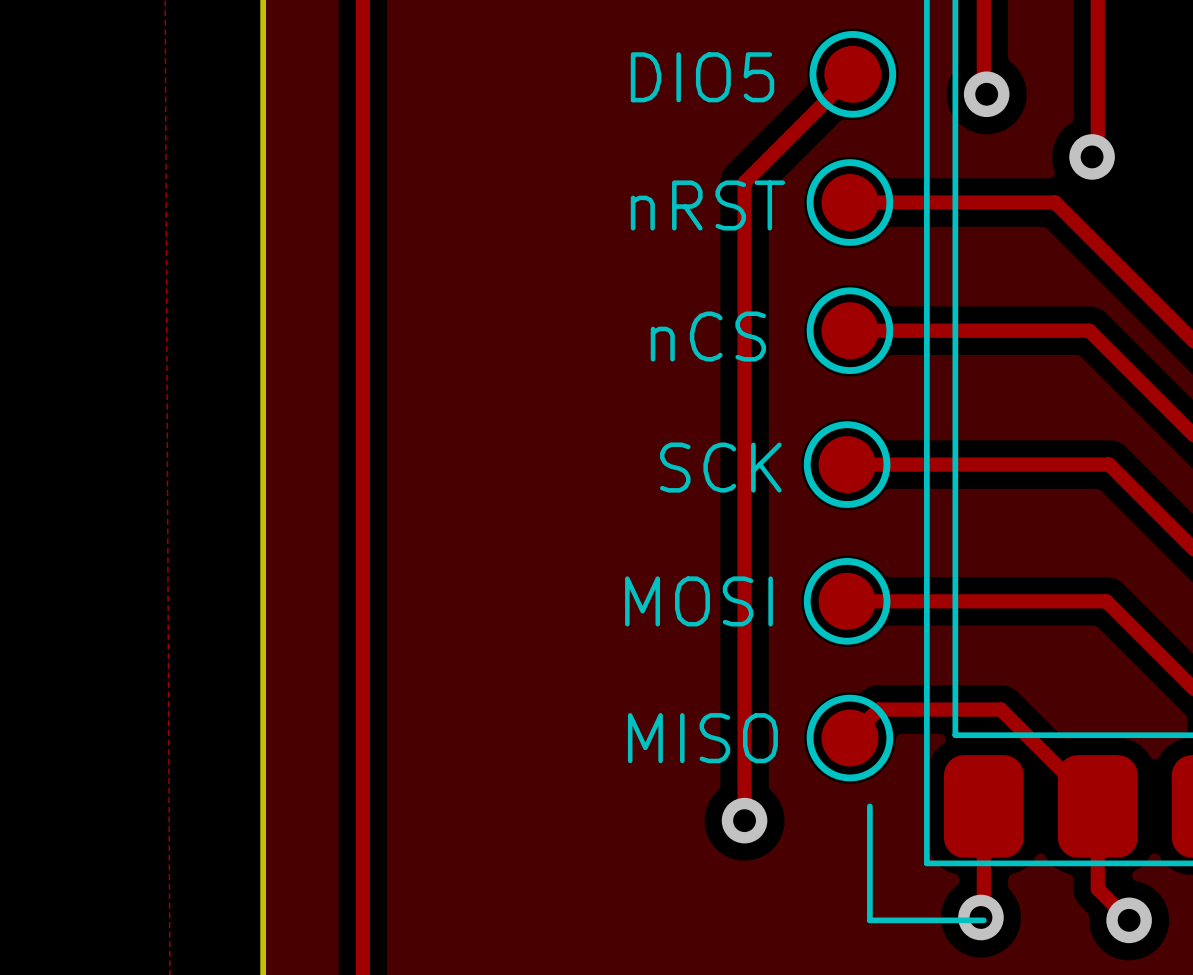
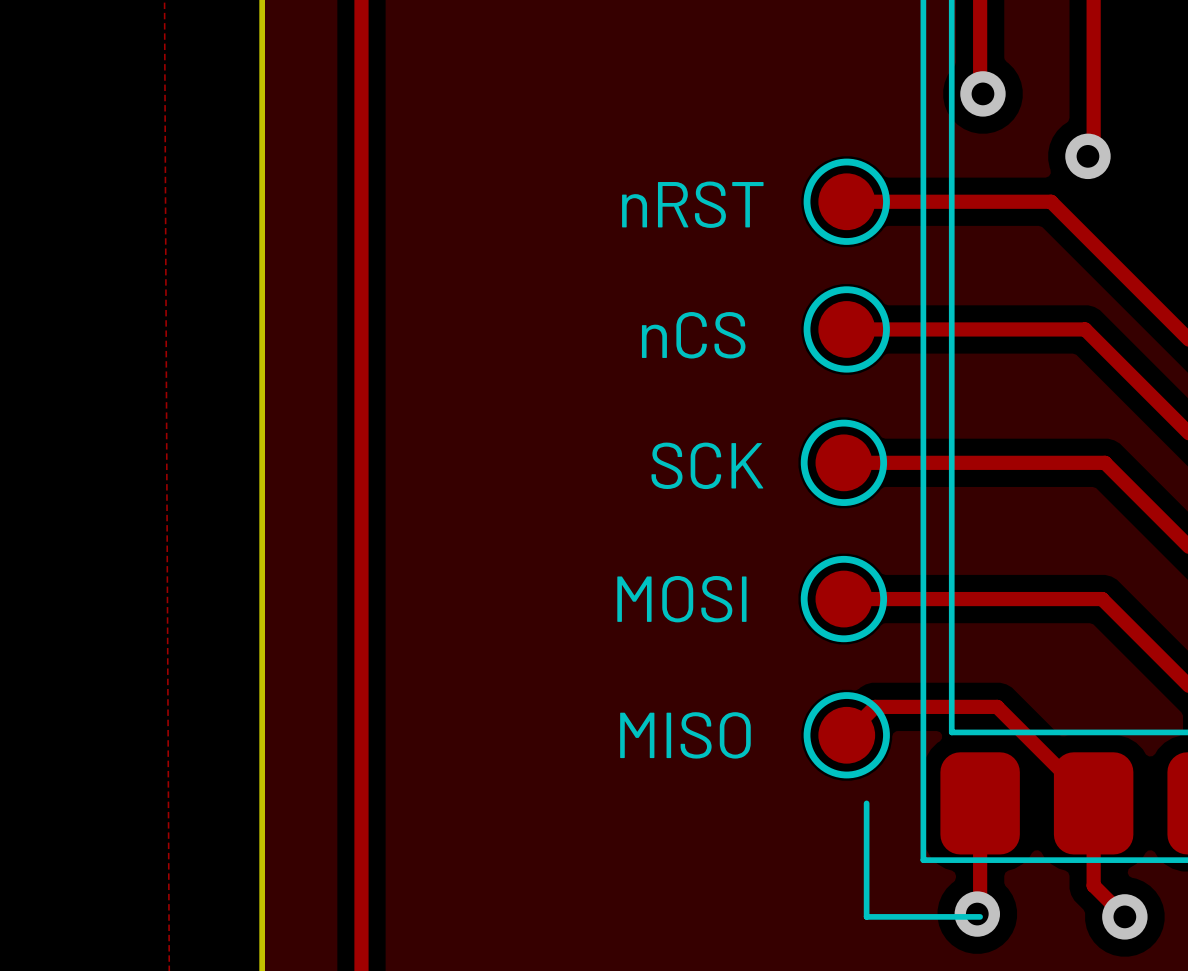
track: (852, 74) (744, 182) (744, 826) -> none
part: (852, 74) -> none
text: DIO5 (702, 77) -> none
via: (744, 820) -> none

